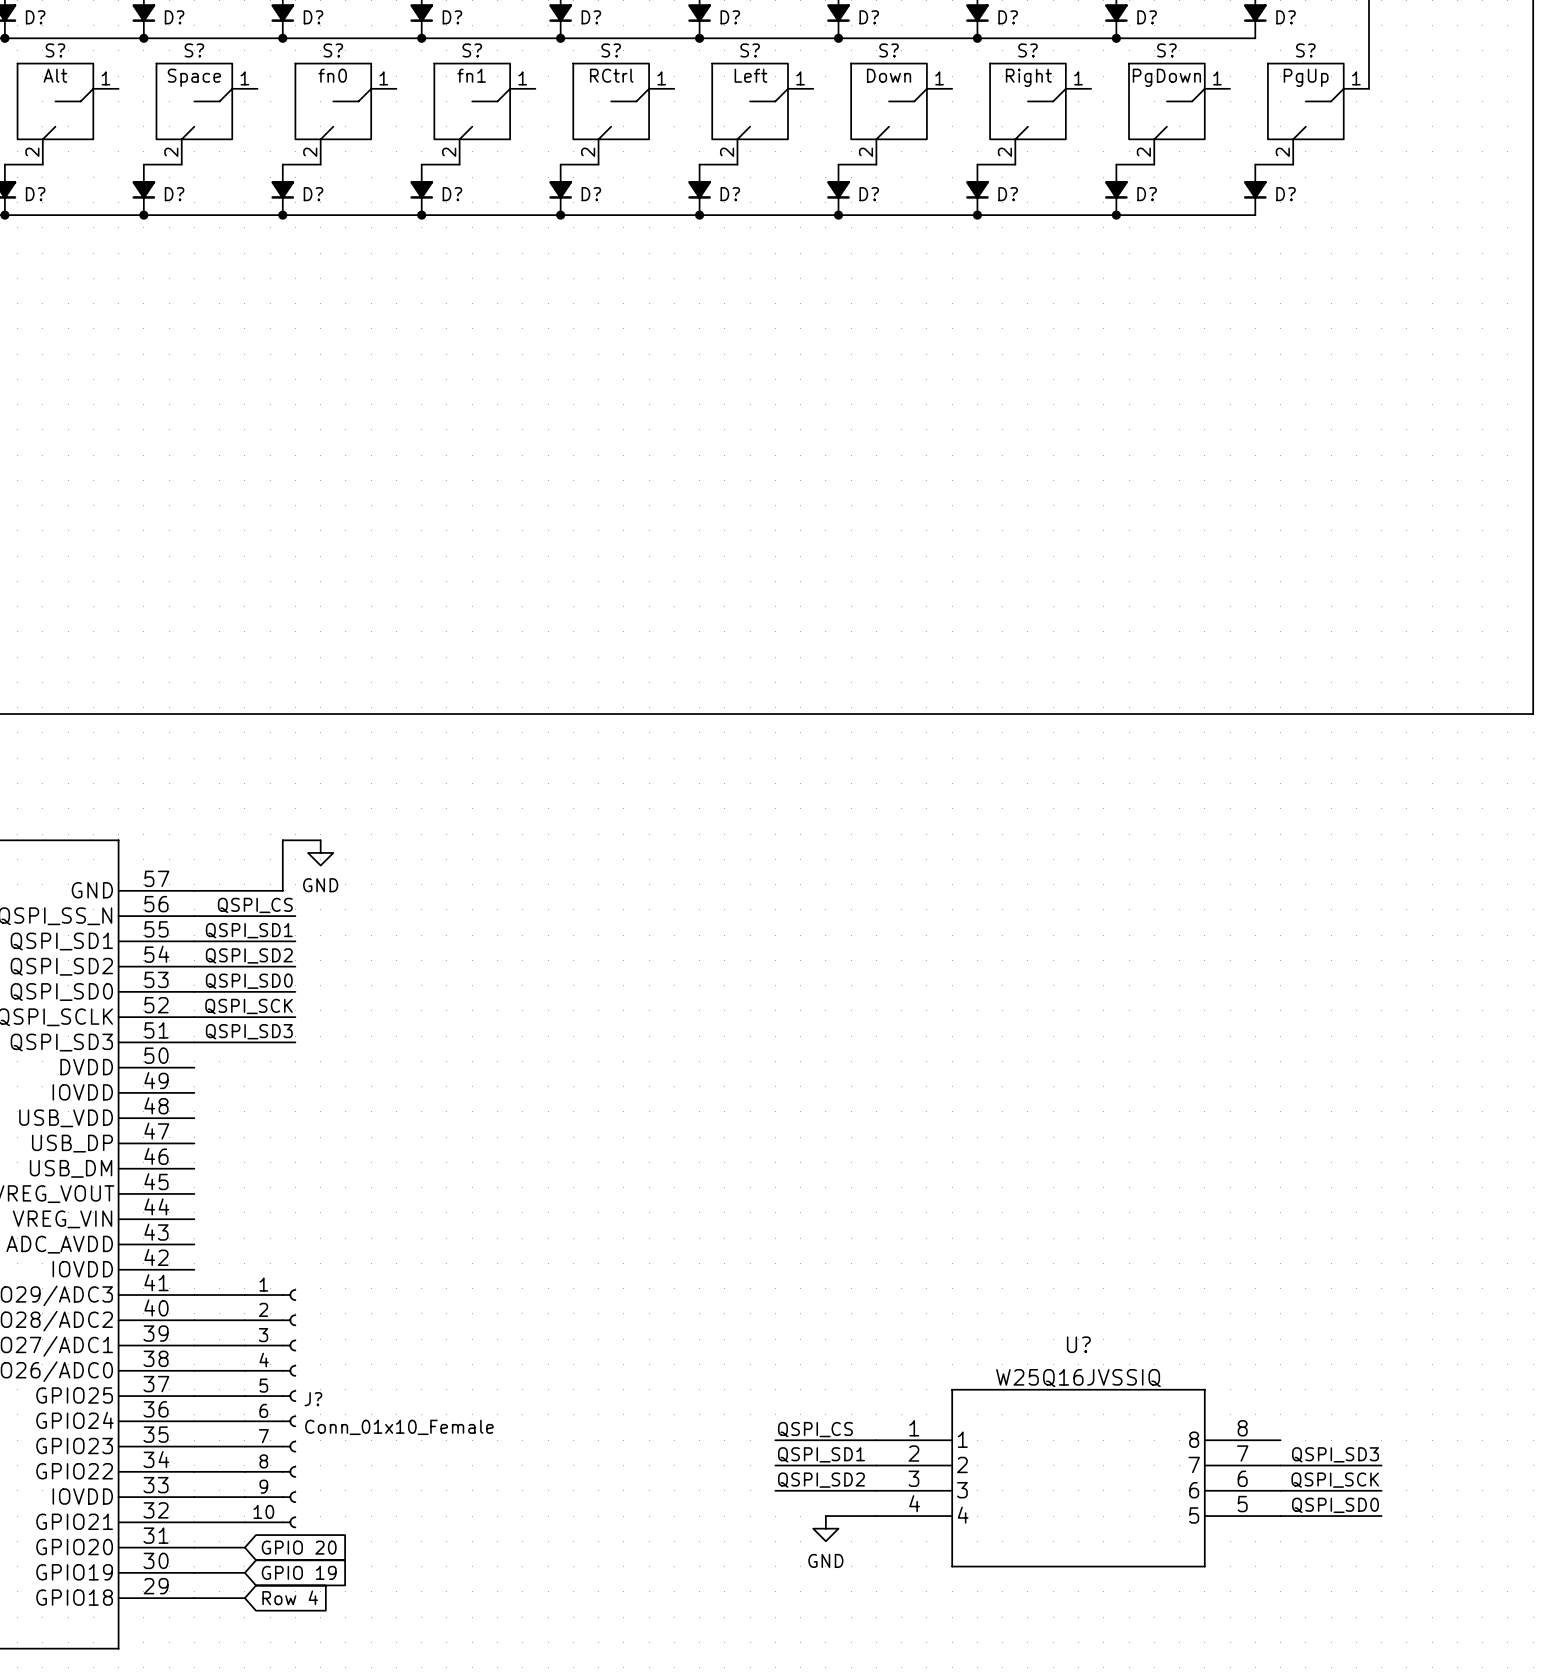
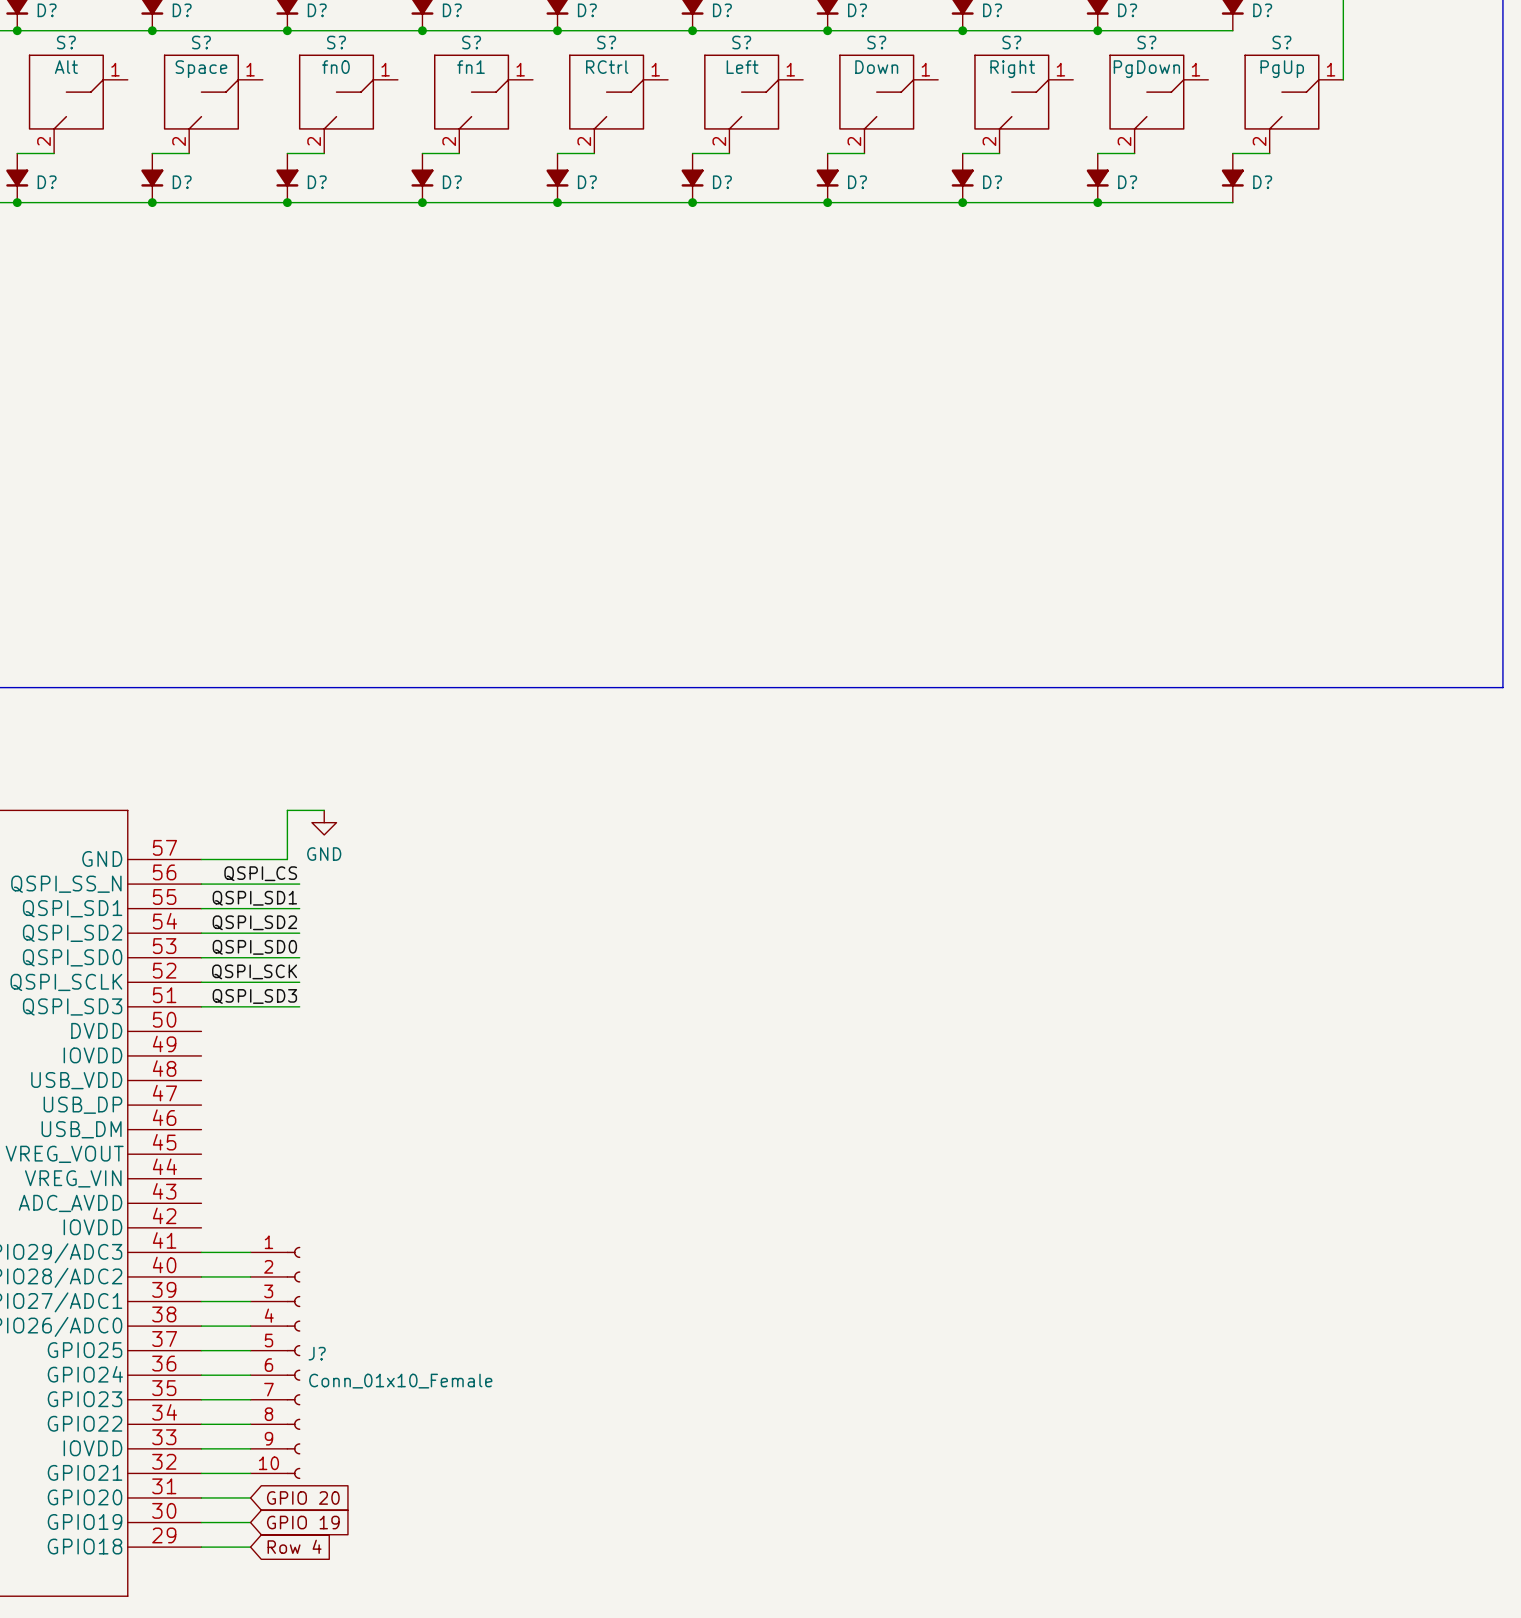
label: QSPI_CS (815, 1429) -> none
wire: (775, 1440) (876, 1440) -> none
label: QSPI_SD1 (821, 1454) -> none
label: QSPI_SD3 (1335, 1454) -> none
wire: (775, 1465) (876, 1465) -> none
wire: (1280, 1465) (1381, 1465) -> none
U?: W25Q16JVSSIQ (1078, 1478) -> none
label: QSPI_SD2 (821, 1480) -> none
label: QSPI_SCK (1335, 1480) -> none
wire: (775, 1490) (876, 1490) -> none
wire: (1280, 1490) (1381, 1490) -> none
label: QSPI_SD0 (1335, 1505) -> none
wire: (825, 1516) (876, 1516) -> none
wire: (1280, 1516) (1381, 1516) -> none
power symbol: GND (825, 1528) -> none

